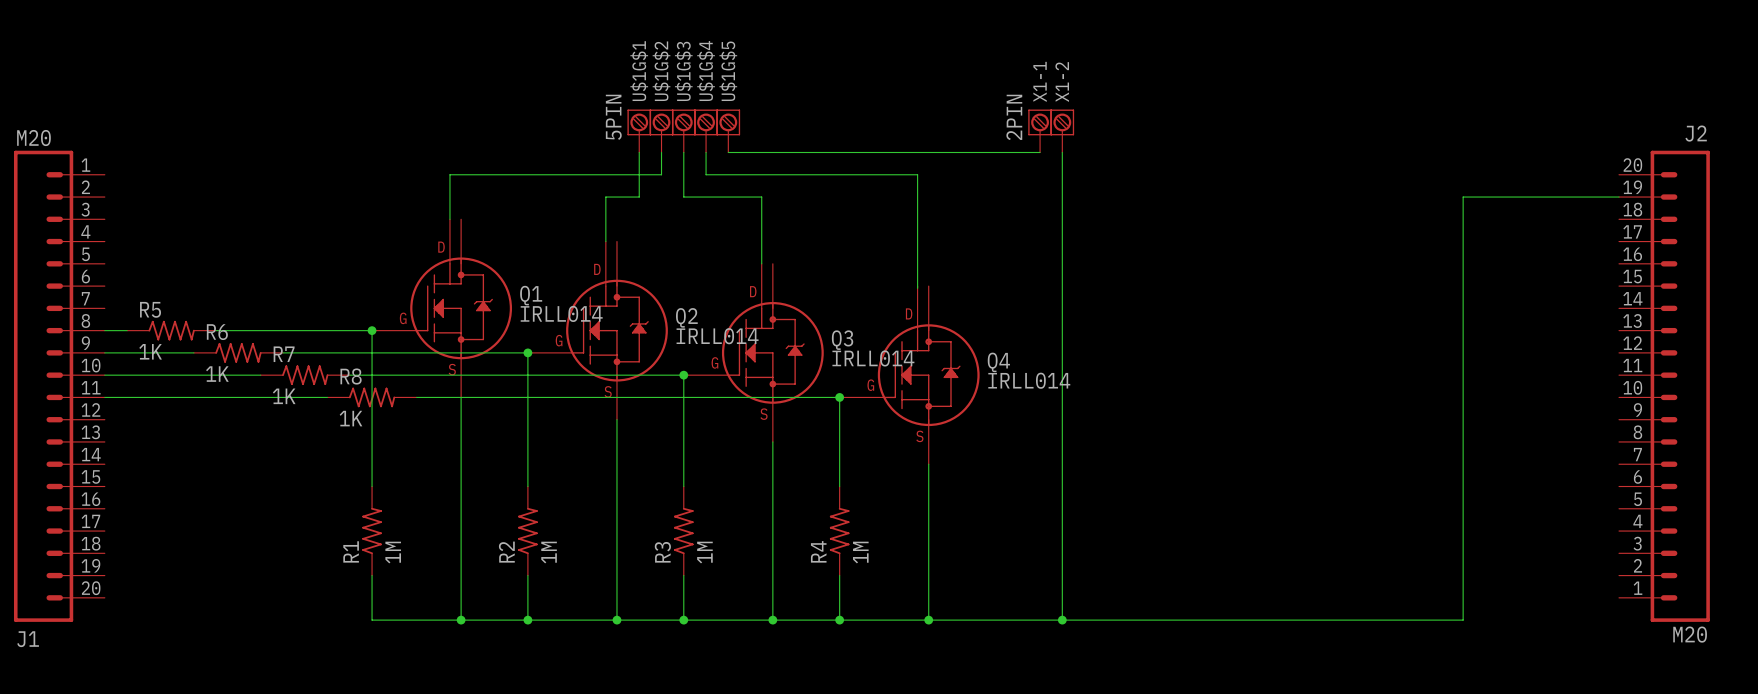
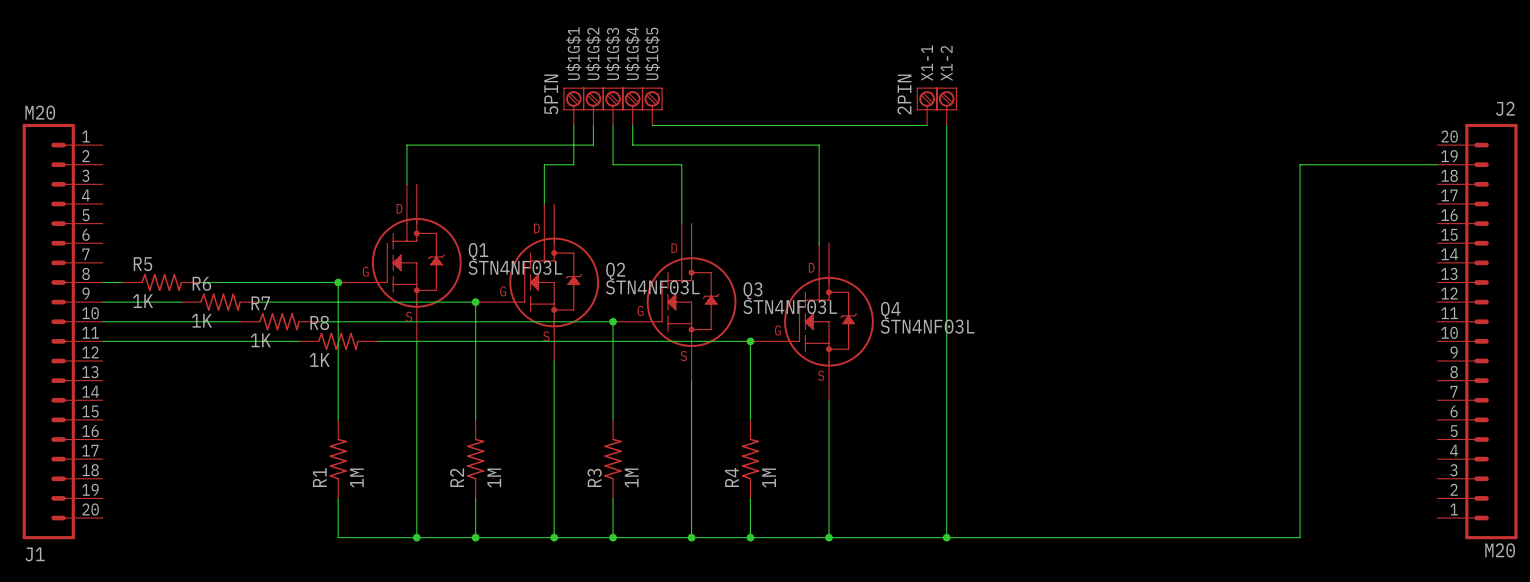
Q1 value: IRLL014 (561, 313) -> STN4NF03L (515, 267)
Q2 value: IRLL014 (717, 336) -> STN4NF03L (652, 287)
Q3 value: IRLL014 (873, 358) -> STN4NF03L (790, 307)
Q4 value: IRLL014 (1029, 380) -> STN4NF03L (927, 326)

